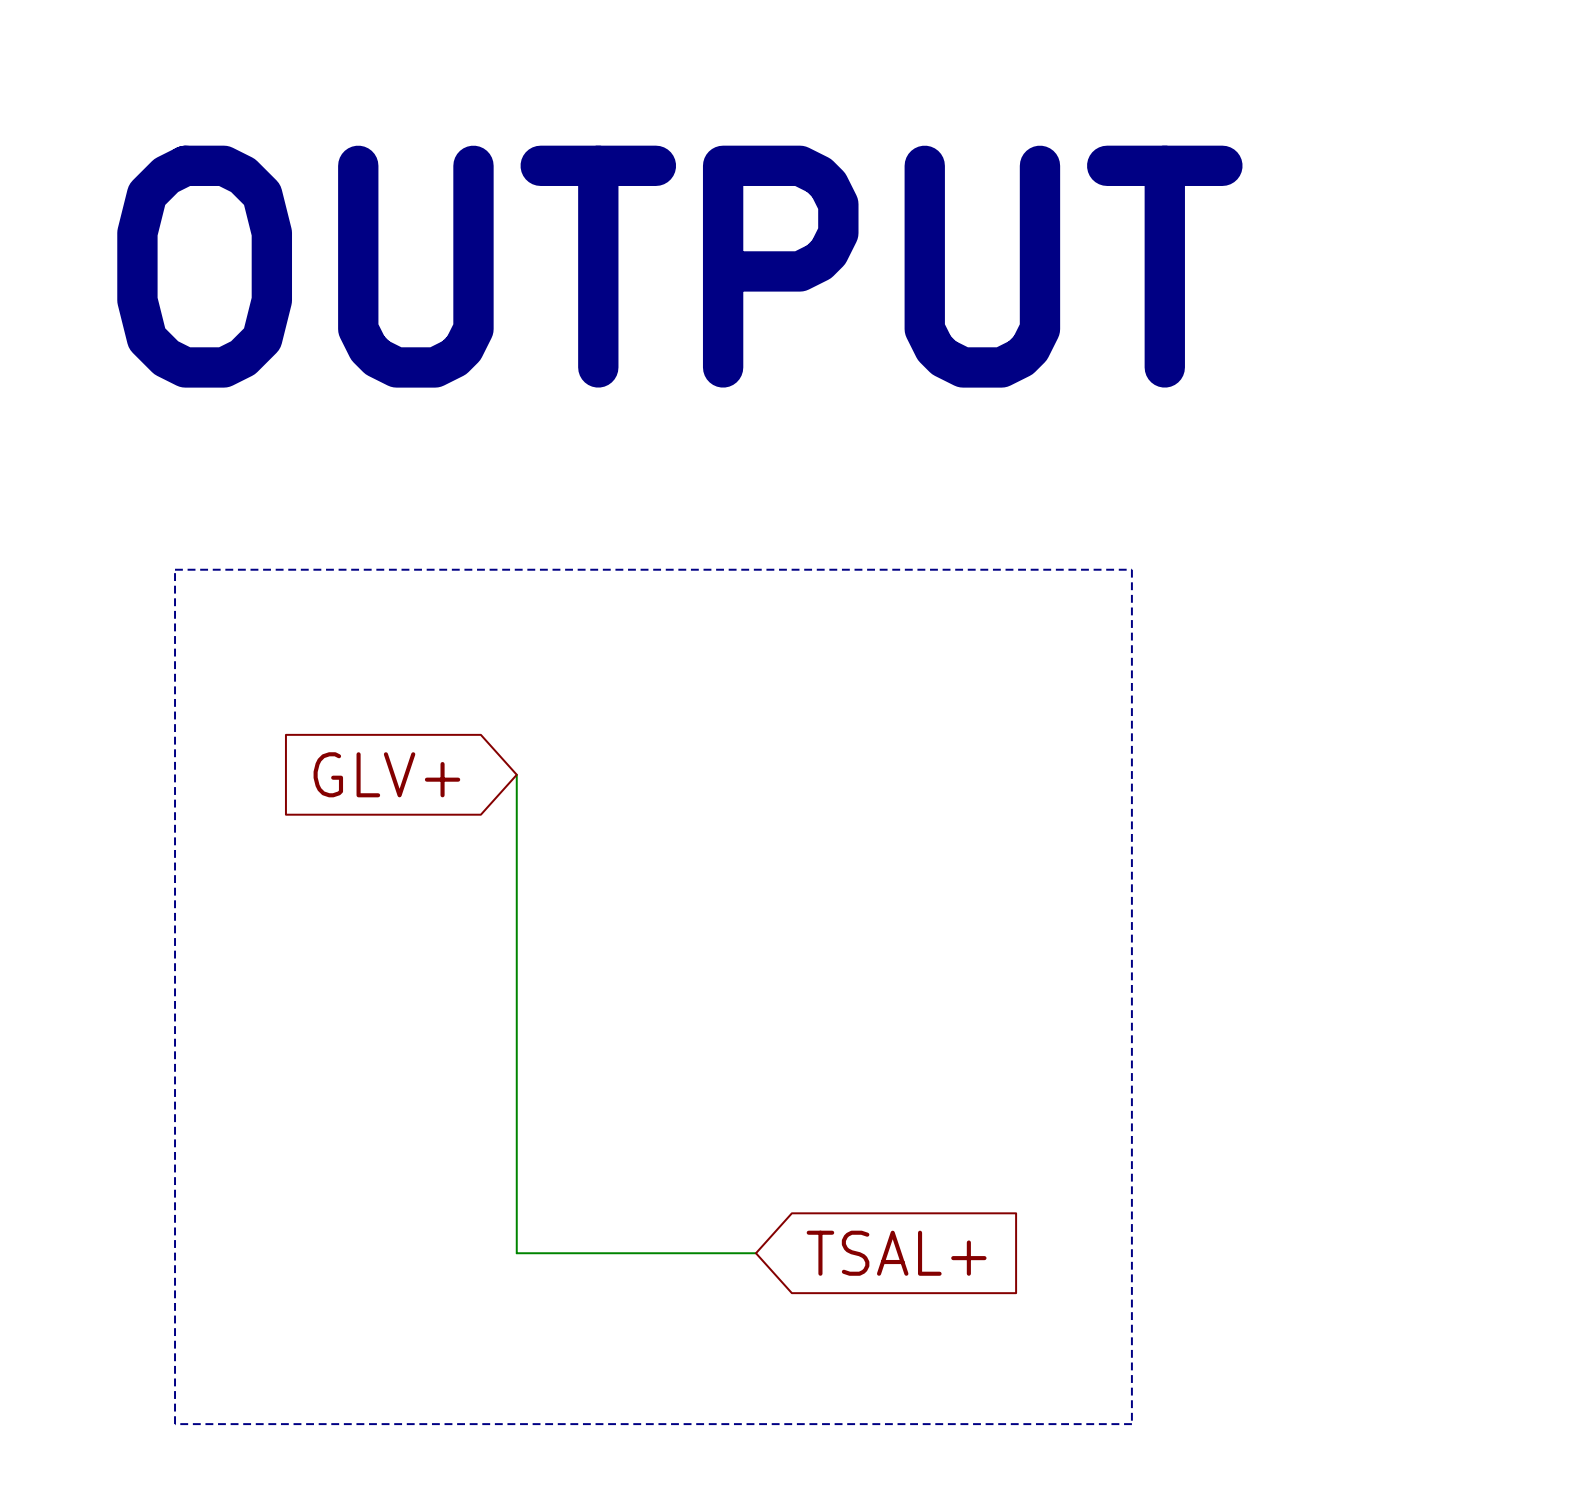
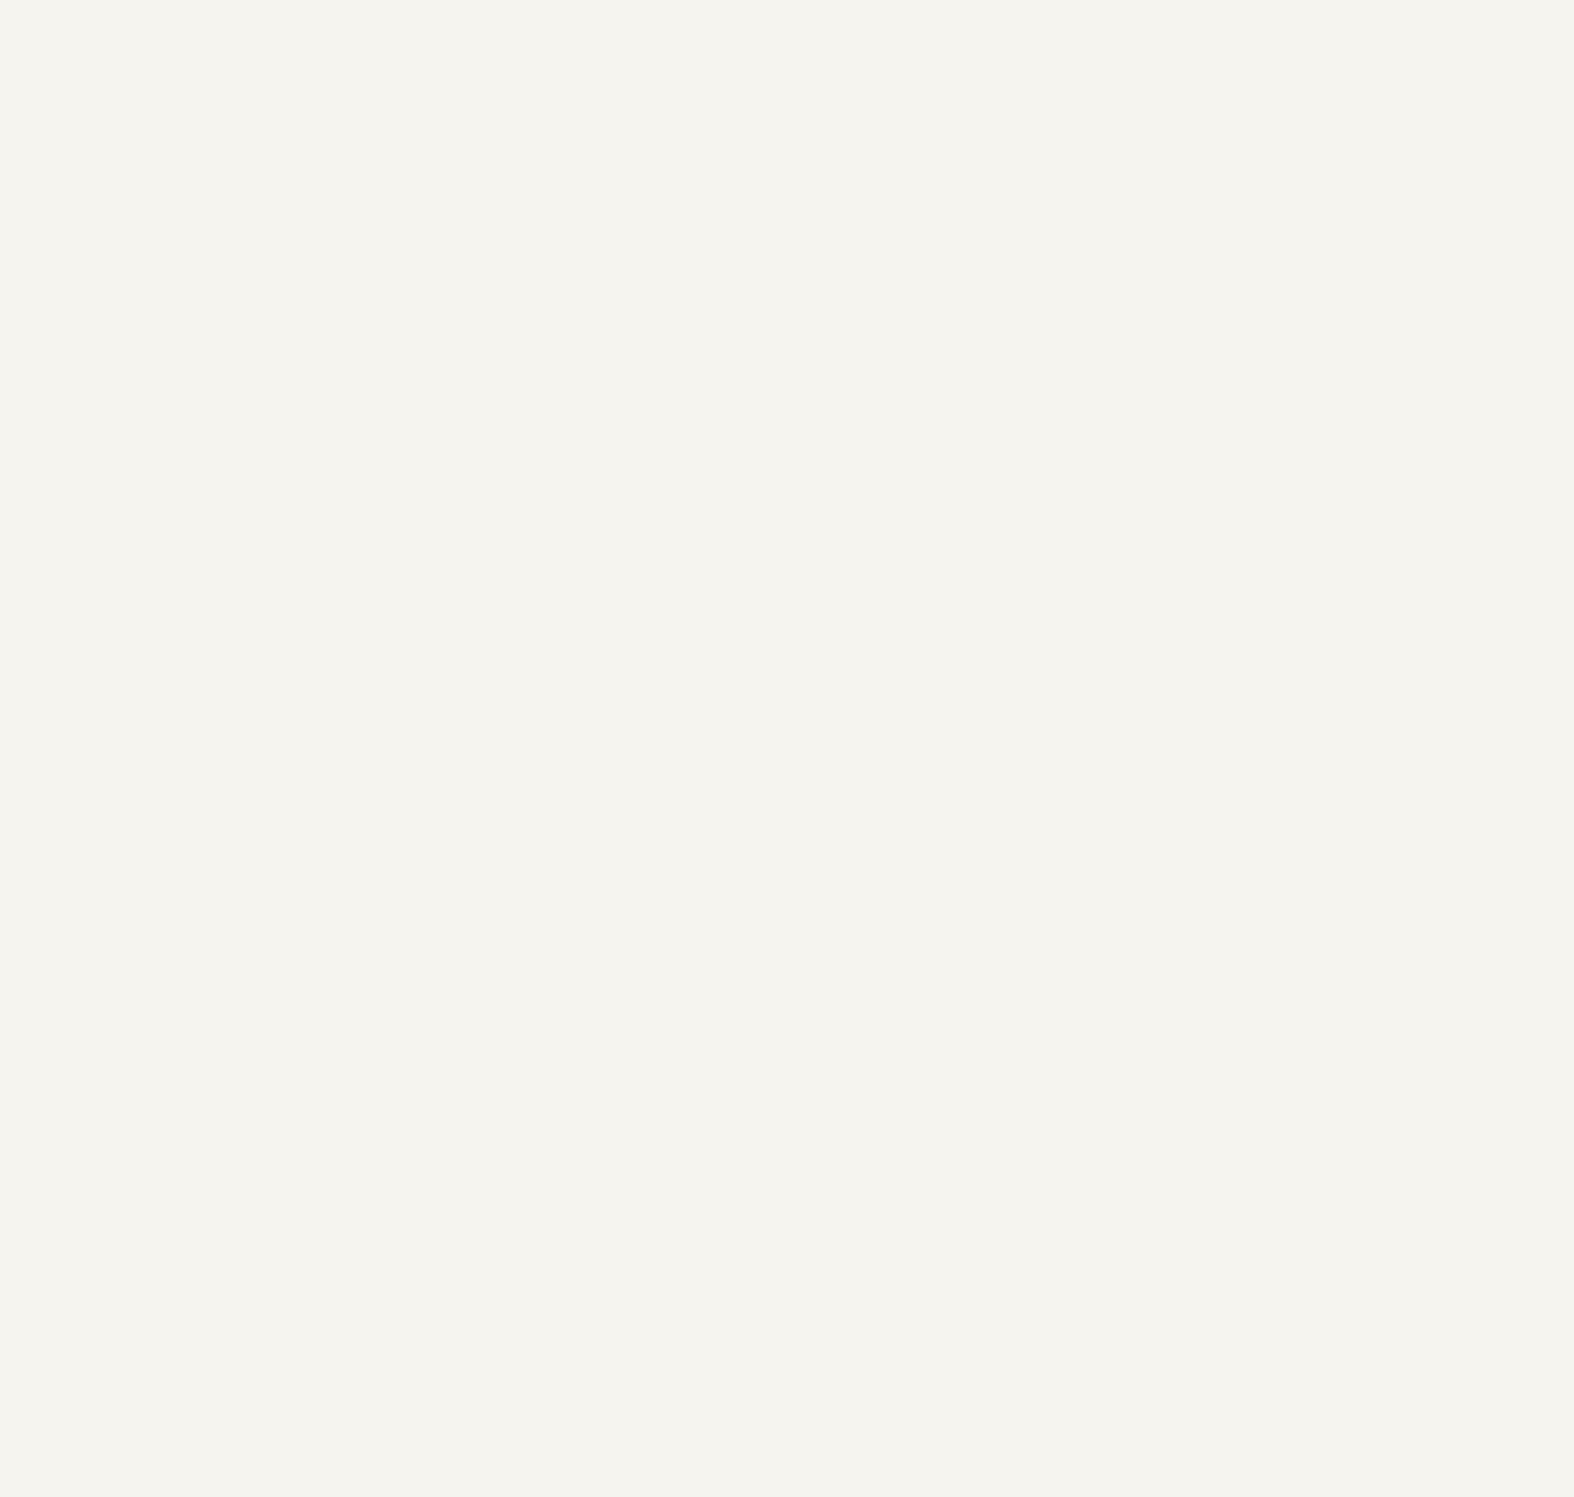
text: OUTPUT (679, 266) -> none
line: (175, 569) (1131, 569) (1131, 1424) (175, 1424) (175, 569) -> none
global label: GLV+ (386, 774) -> none
wire: (516, 774) (516, 1253) (755, 1253) -> none
global label: TSAL+ (896, 1253) -> none

